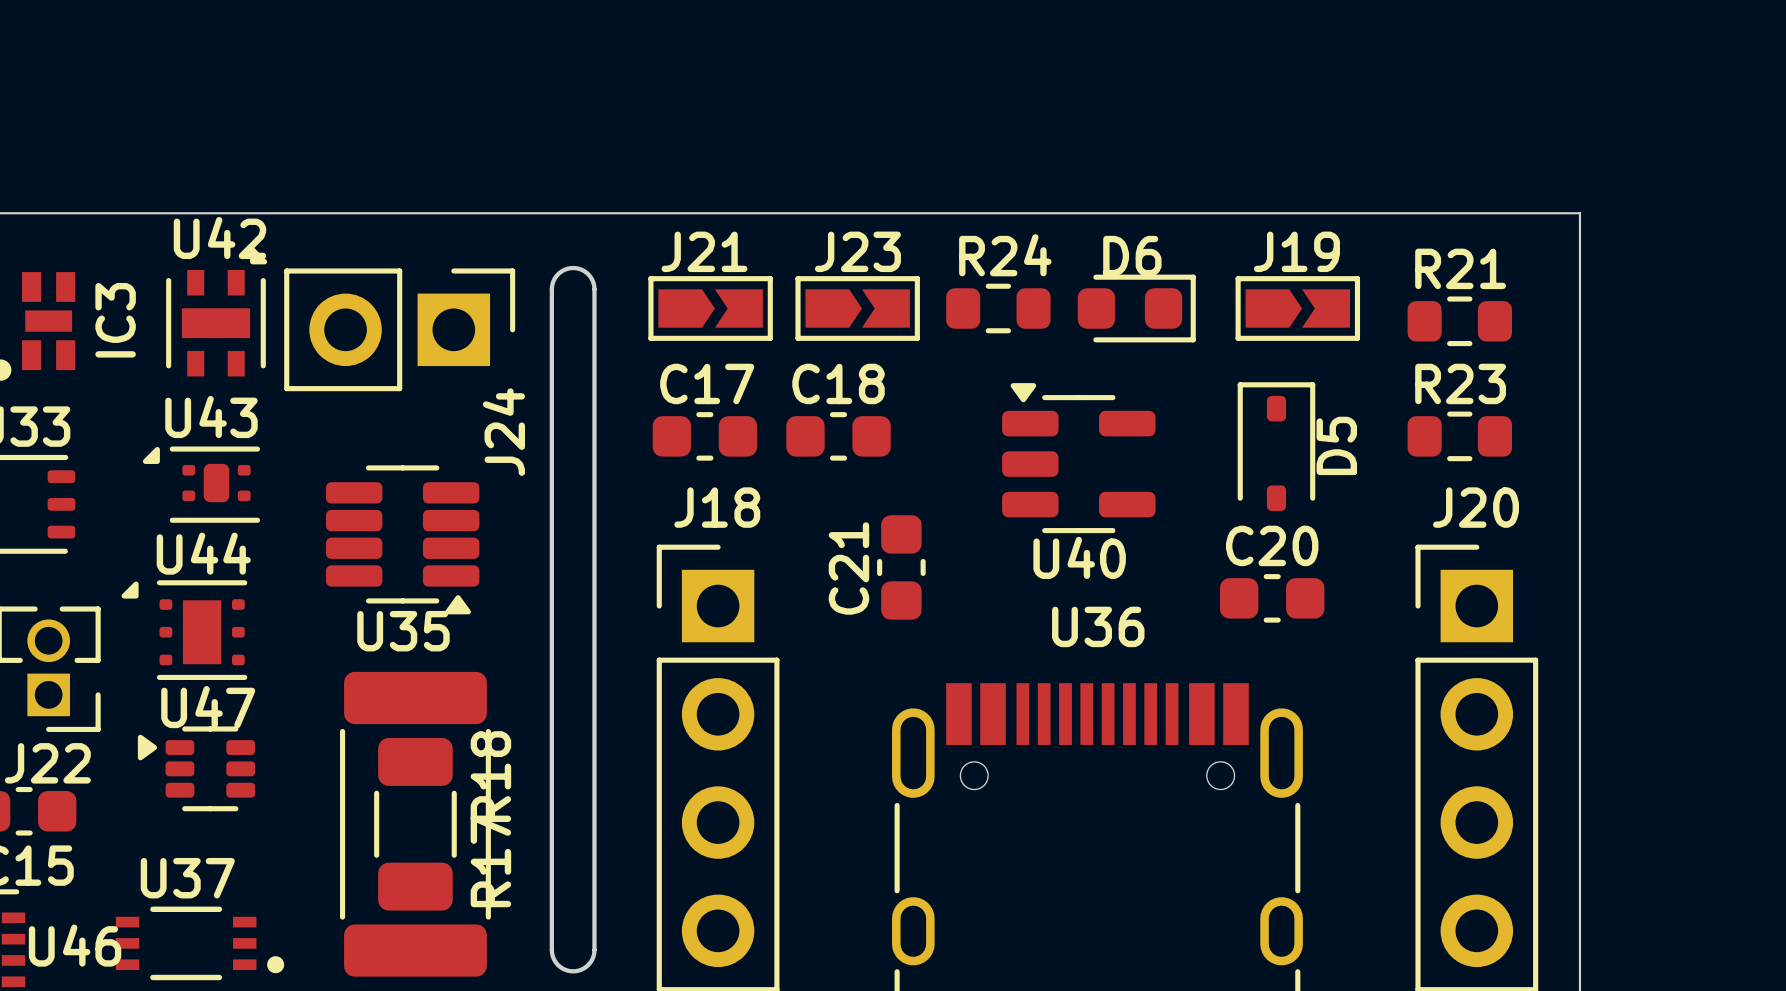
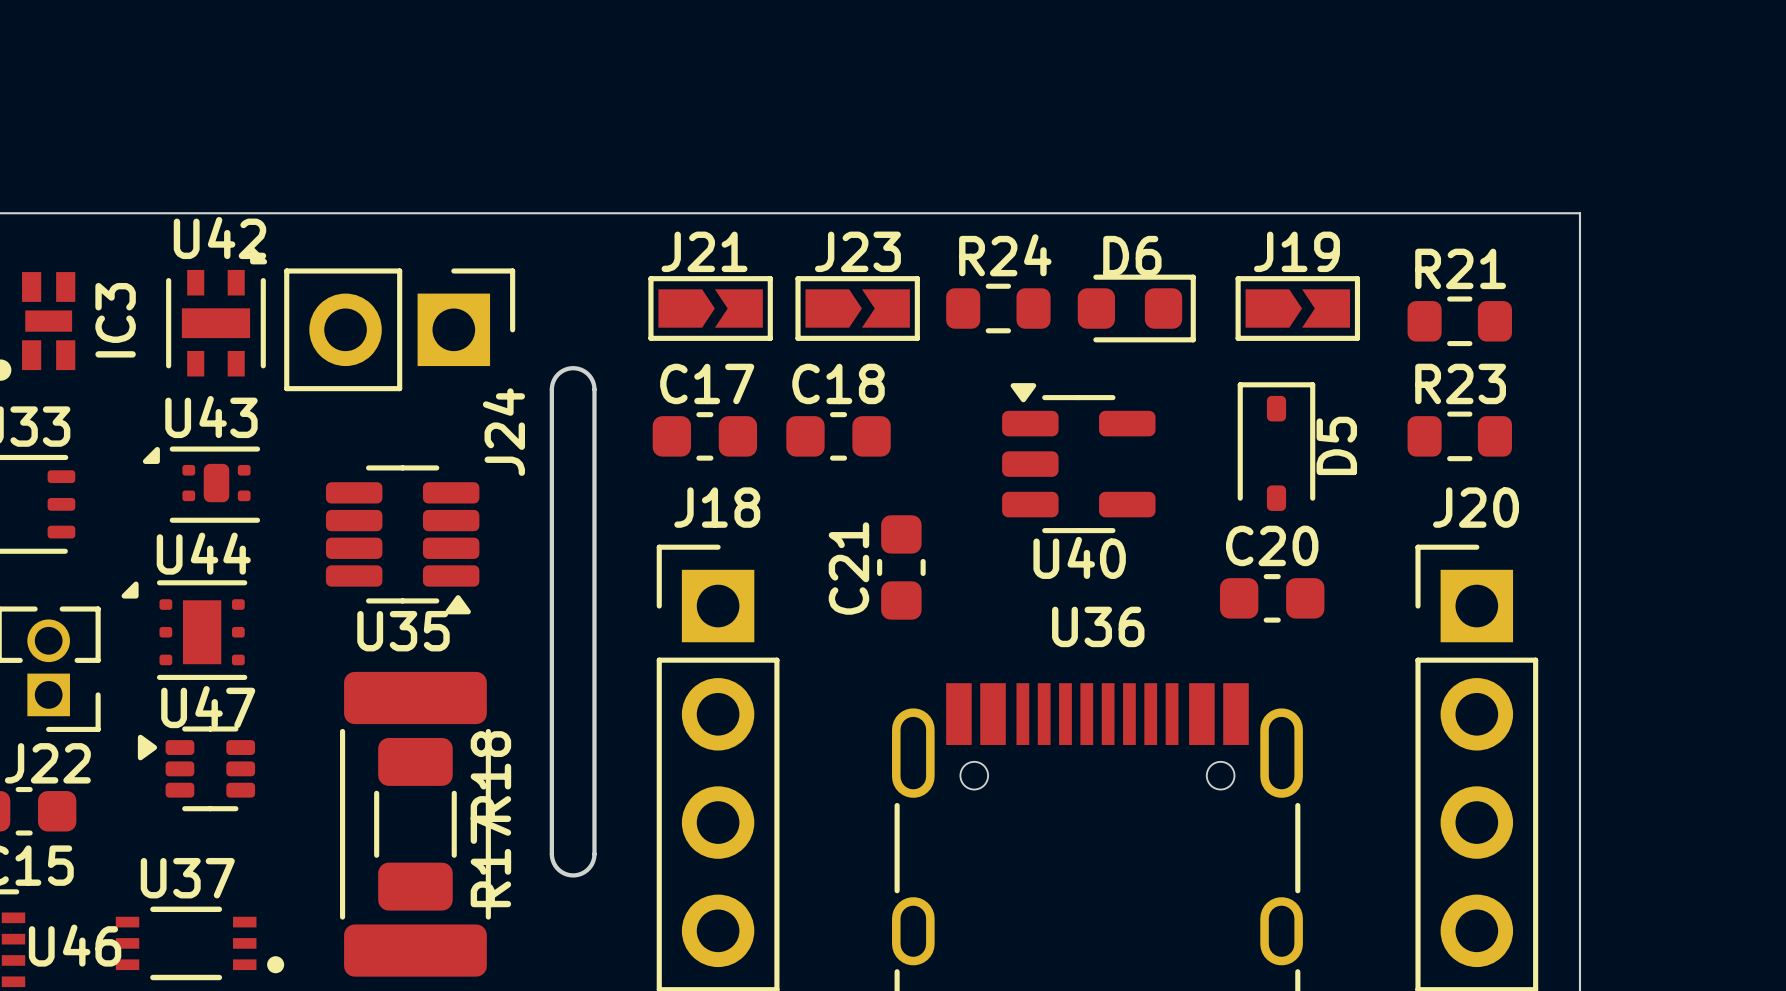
board edge: (551, 389) (552, 286) (554, 278) (560, 272) (573, 268) (586, 272) (591, 278) (594, 286) (594, 389) -> (551, 389) (553, 381) (559, 373) (573, 368) (580, 369) (589, 375) (594, 389)
board edge: (551, 854) (552, 952) (554, 960) (560, 966) (573, 971) (586, 966) (591, 960) (594, 952) (594, 854) -> (551, 854) (553, 861) (559, 870) (573, 875) (580, 874) (589, 868) (594, 854)

